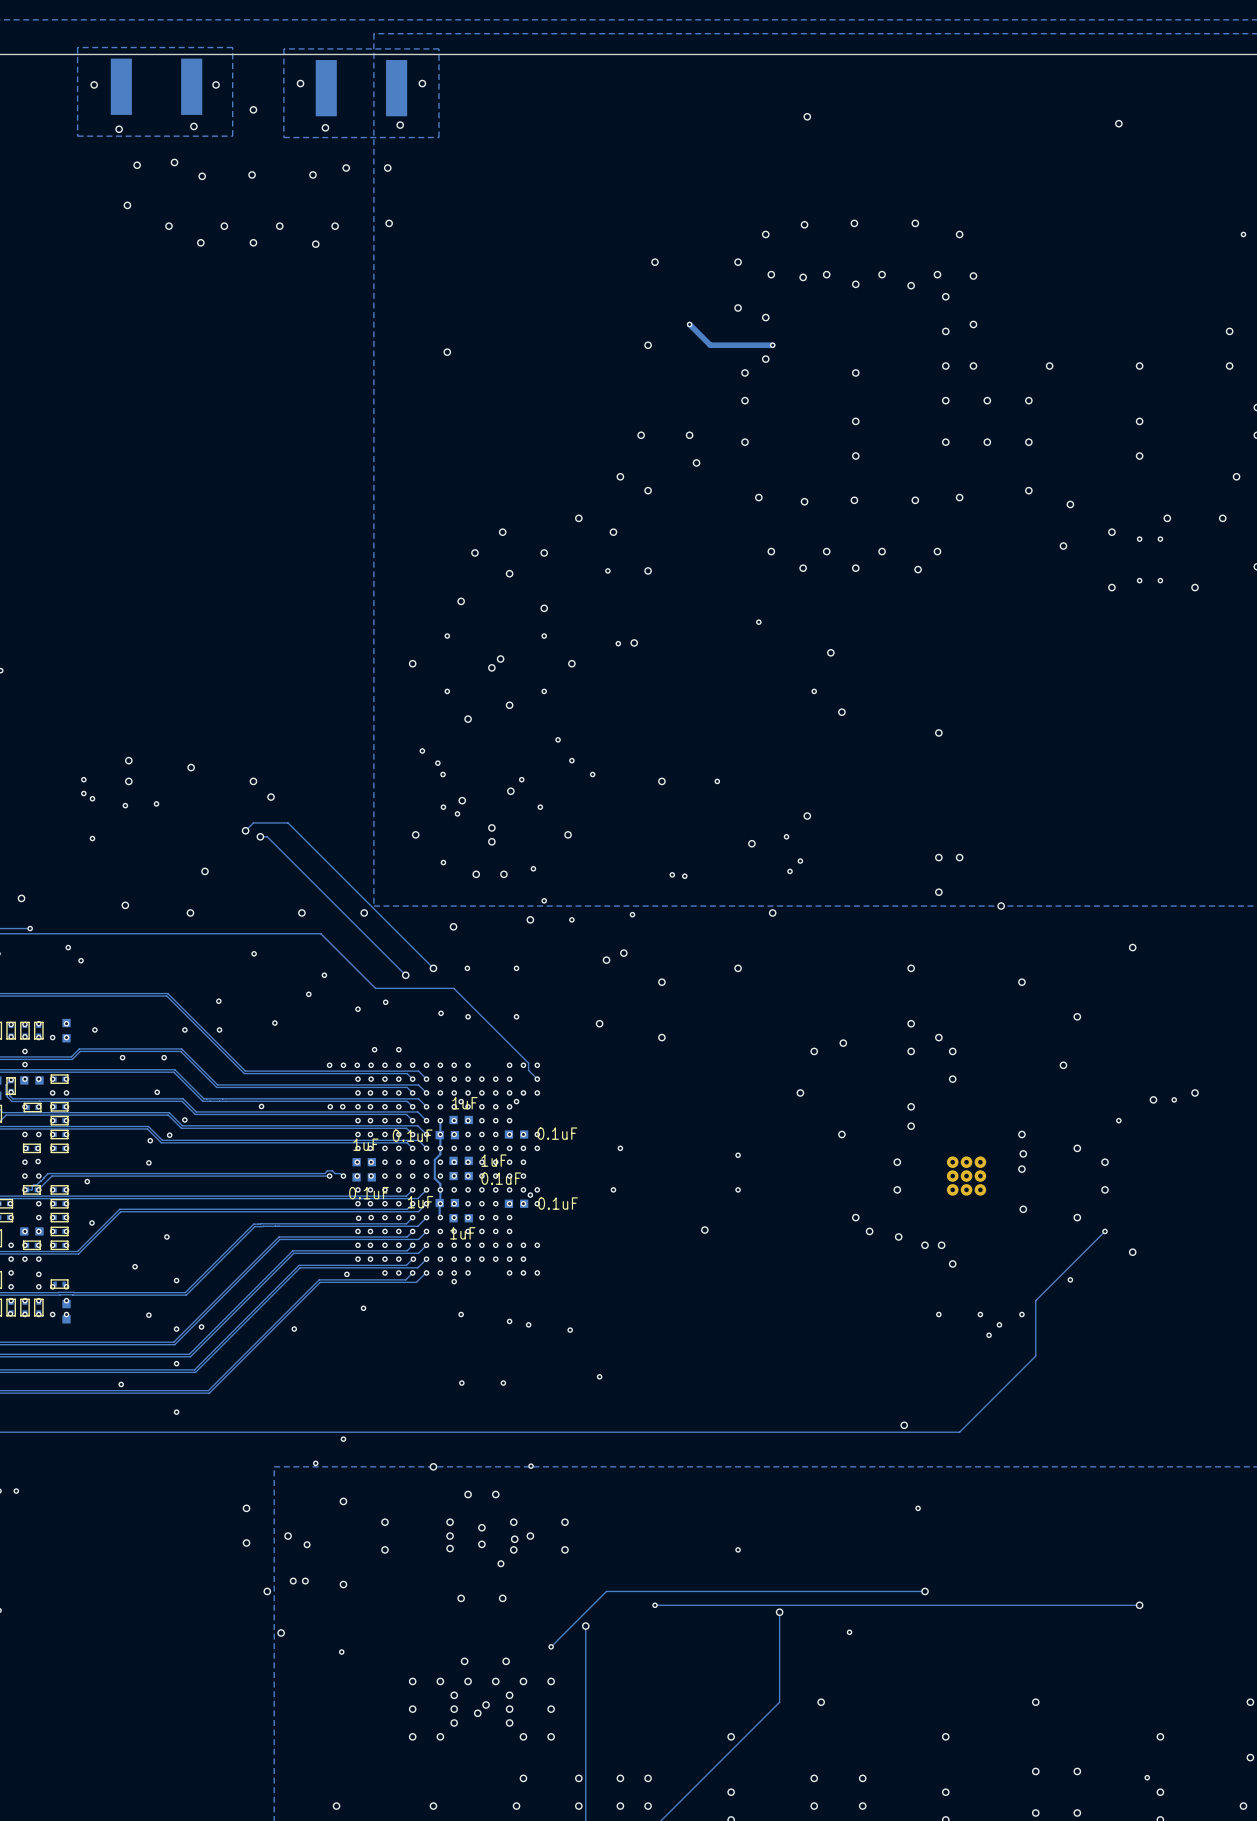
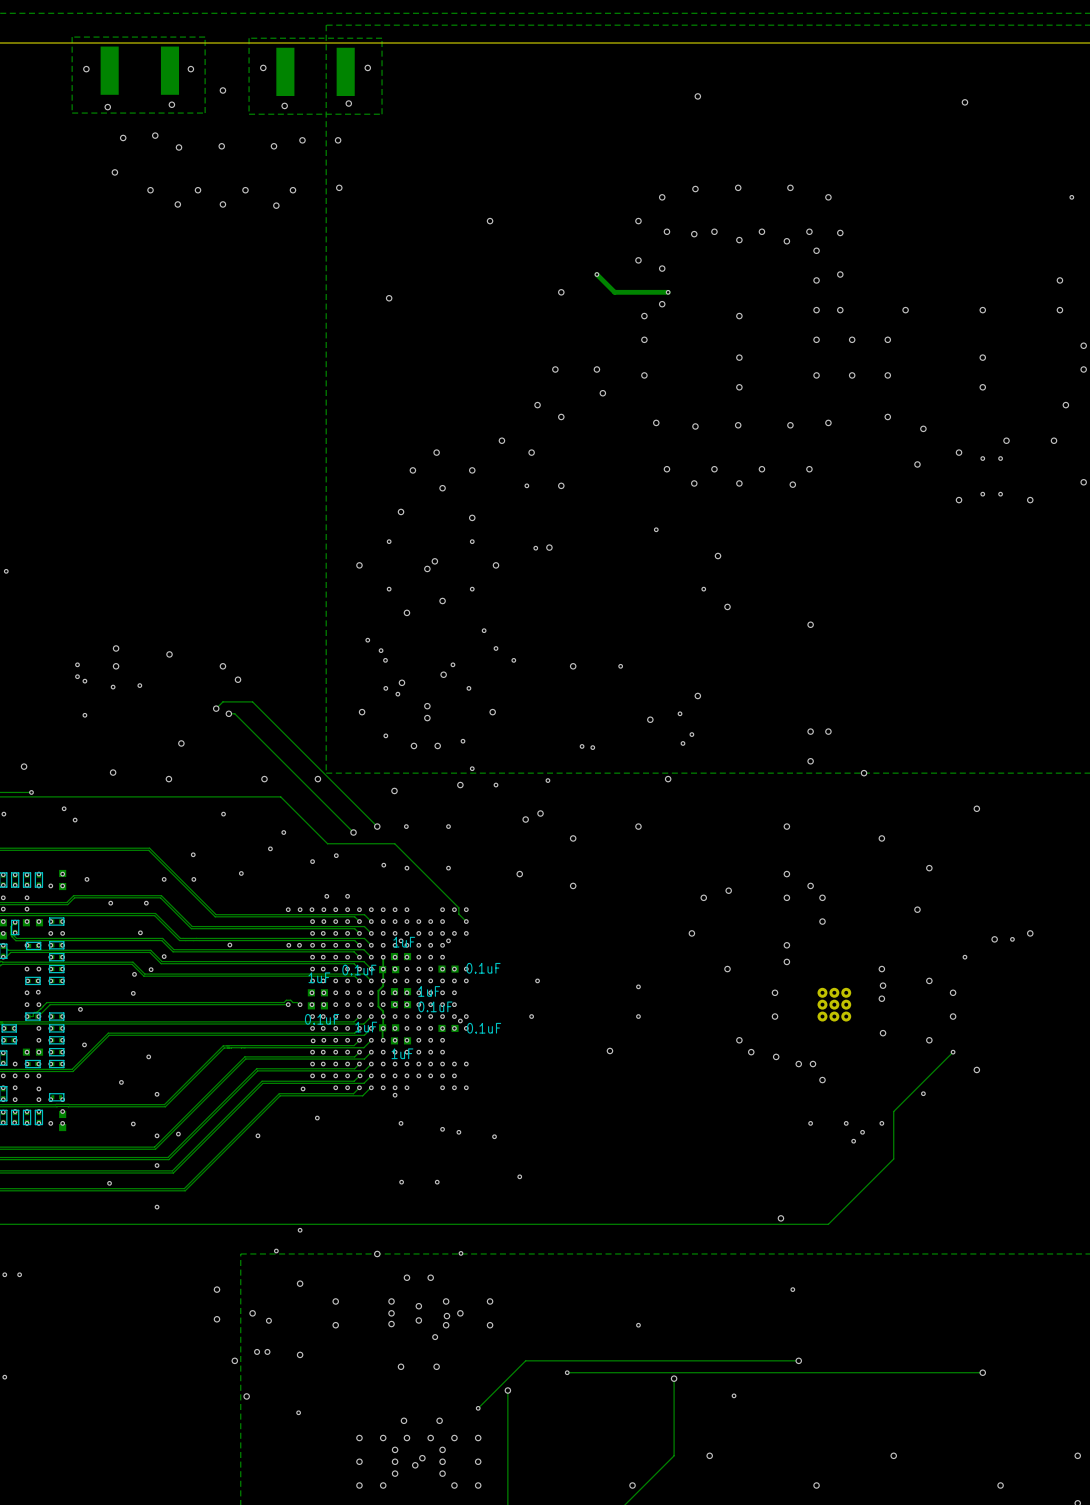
via: none -> (490, 221)
via: (654, 262) -> none

